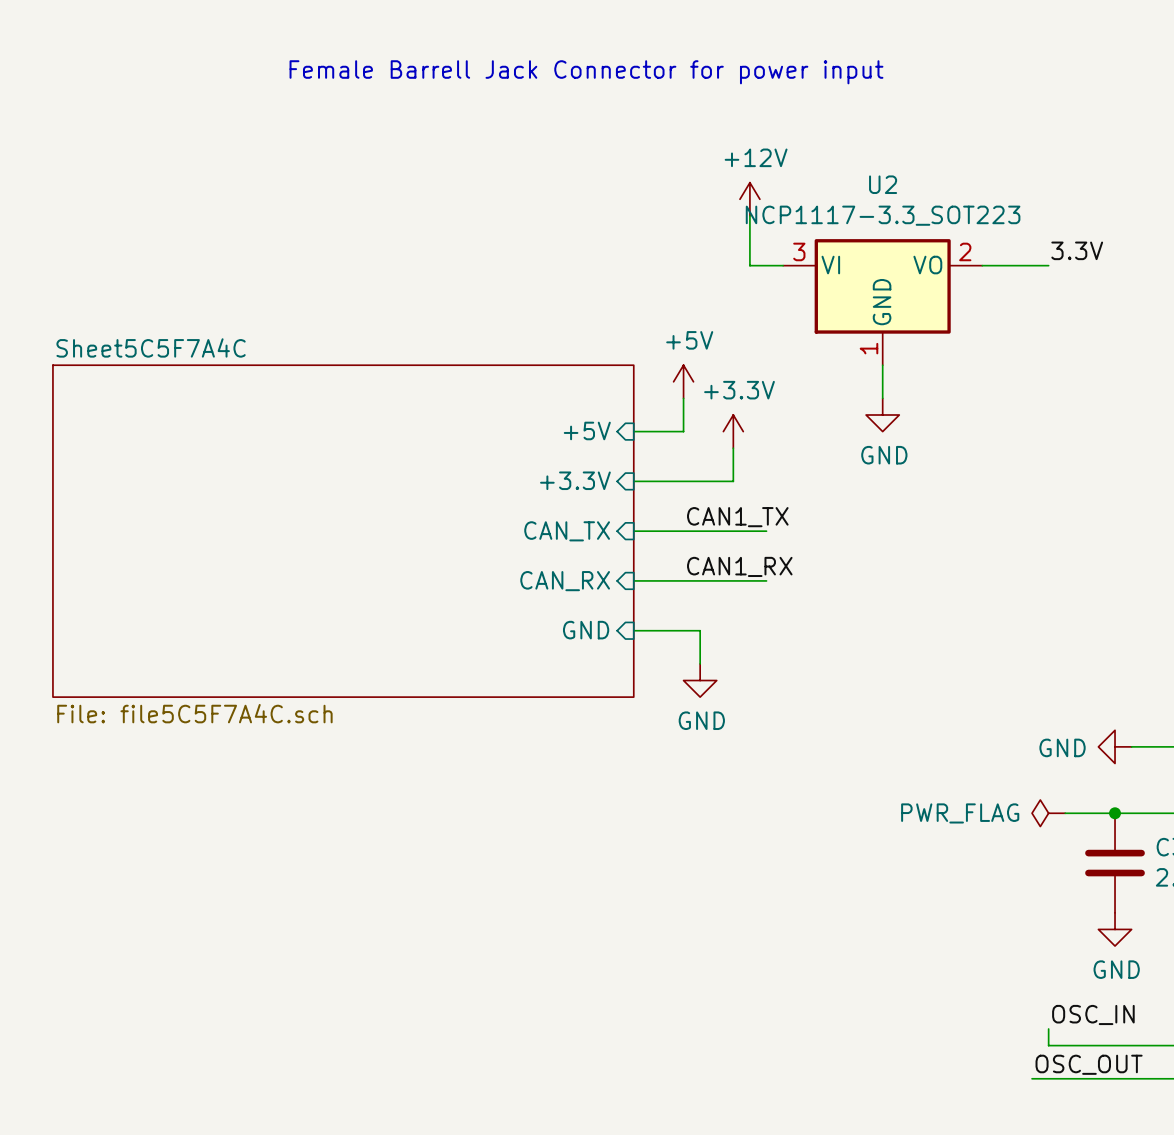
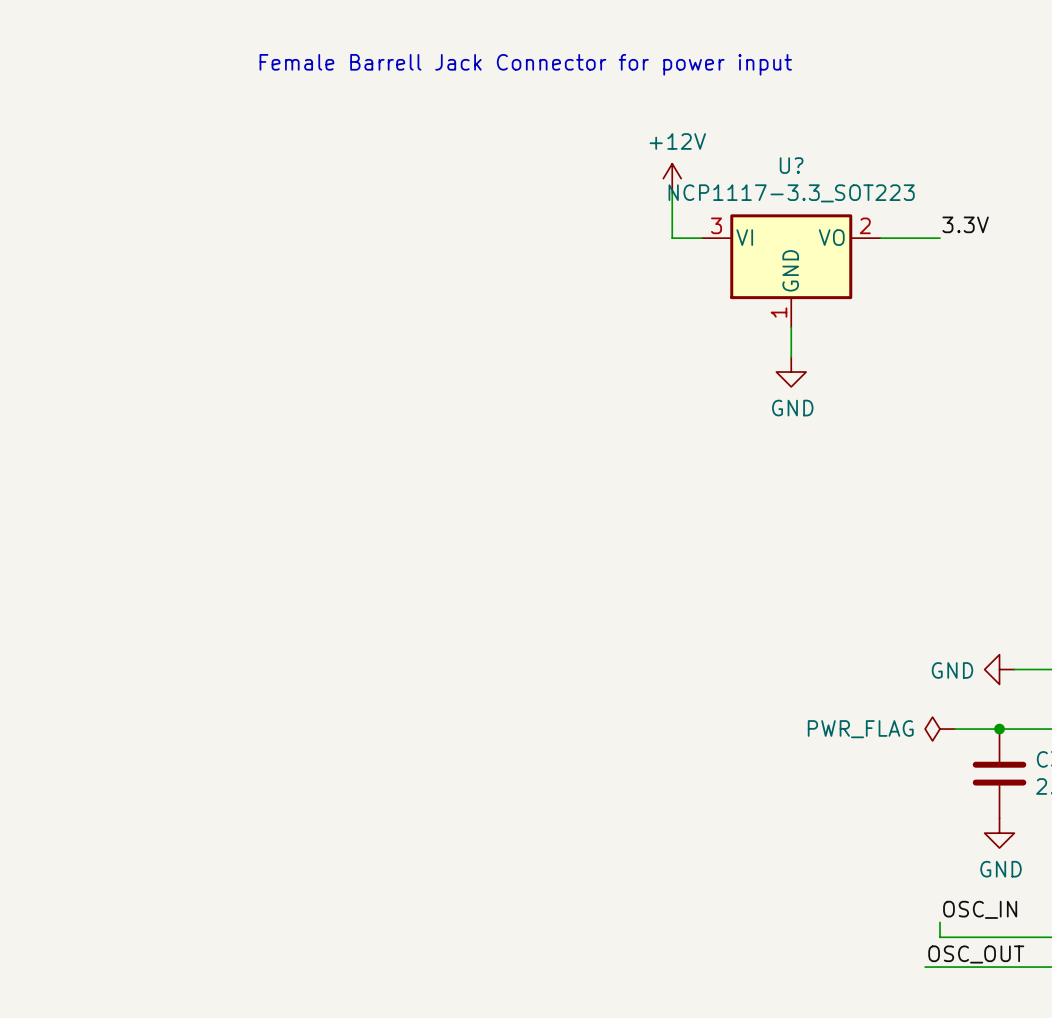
U2 name: U2 (883, 184) -> U? (791, 165)
power symbol: +5V (683, 381) -> none
wire: (683, 398) (683, 431) (633, 431) -> none
sheet pin: +5V (587, 430) -> none
power symbol: +3.3V (733, 431) -> none
wire: (733, 448) (733, 481) (633, 481) -> none
sheet pin: +3.3V (575, 480) -> none
label: CAN1_TX (737, 517) -> none
sheet Sheet5C5F7A4C: File: file5C5F7A4C.sch (343, 531) -> none
sheet pin: CAN_TX (567, 531) -> none
wire: (633, 531) (766, 531) -> none
label: CAN1_RX (739, 566) -> none
wire: (633, 580) (766, 580) -> none
sheet pin: CAN_RX (565, 581) -> none
sheet pin: GND (586, 630) -> none
wire: (633, 630) (700, 630) (700, 663) -> none
power symbol: GND (700, 680) -> none

